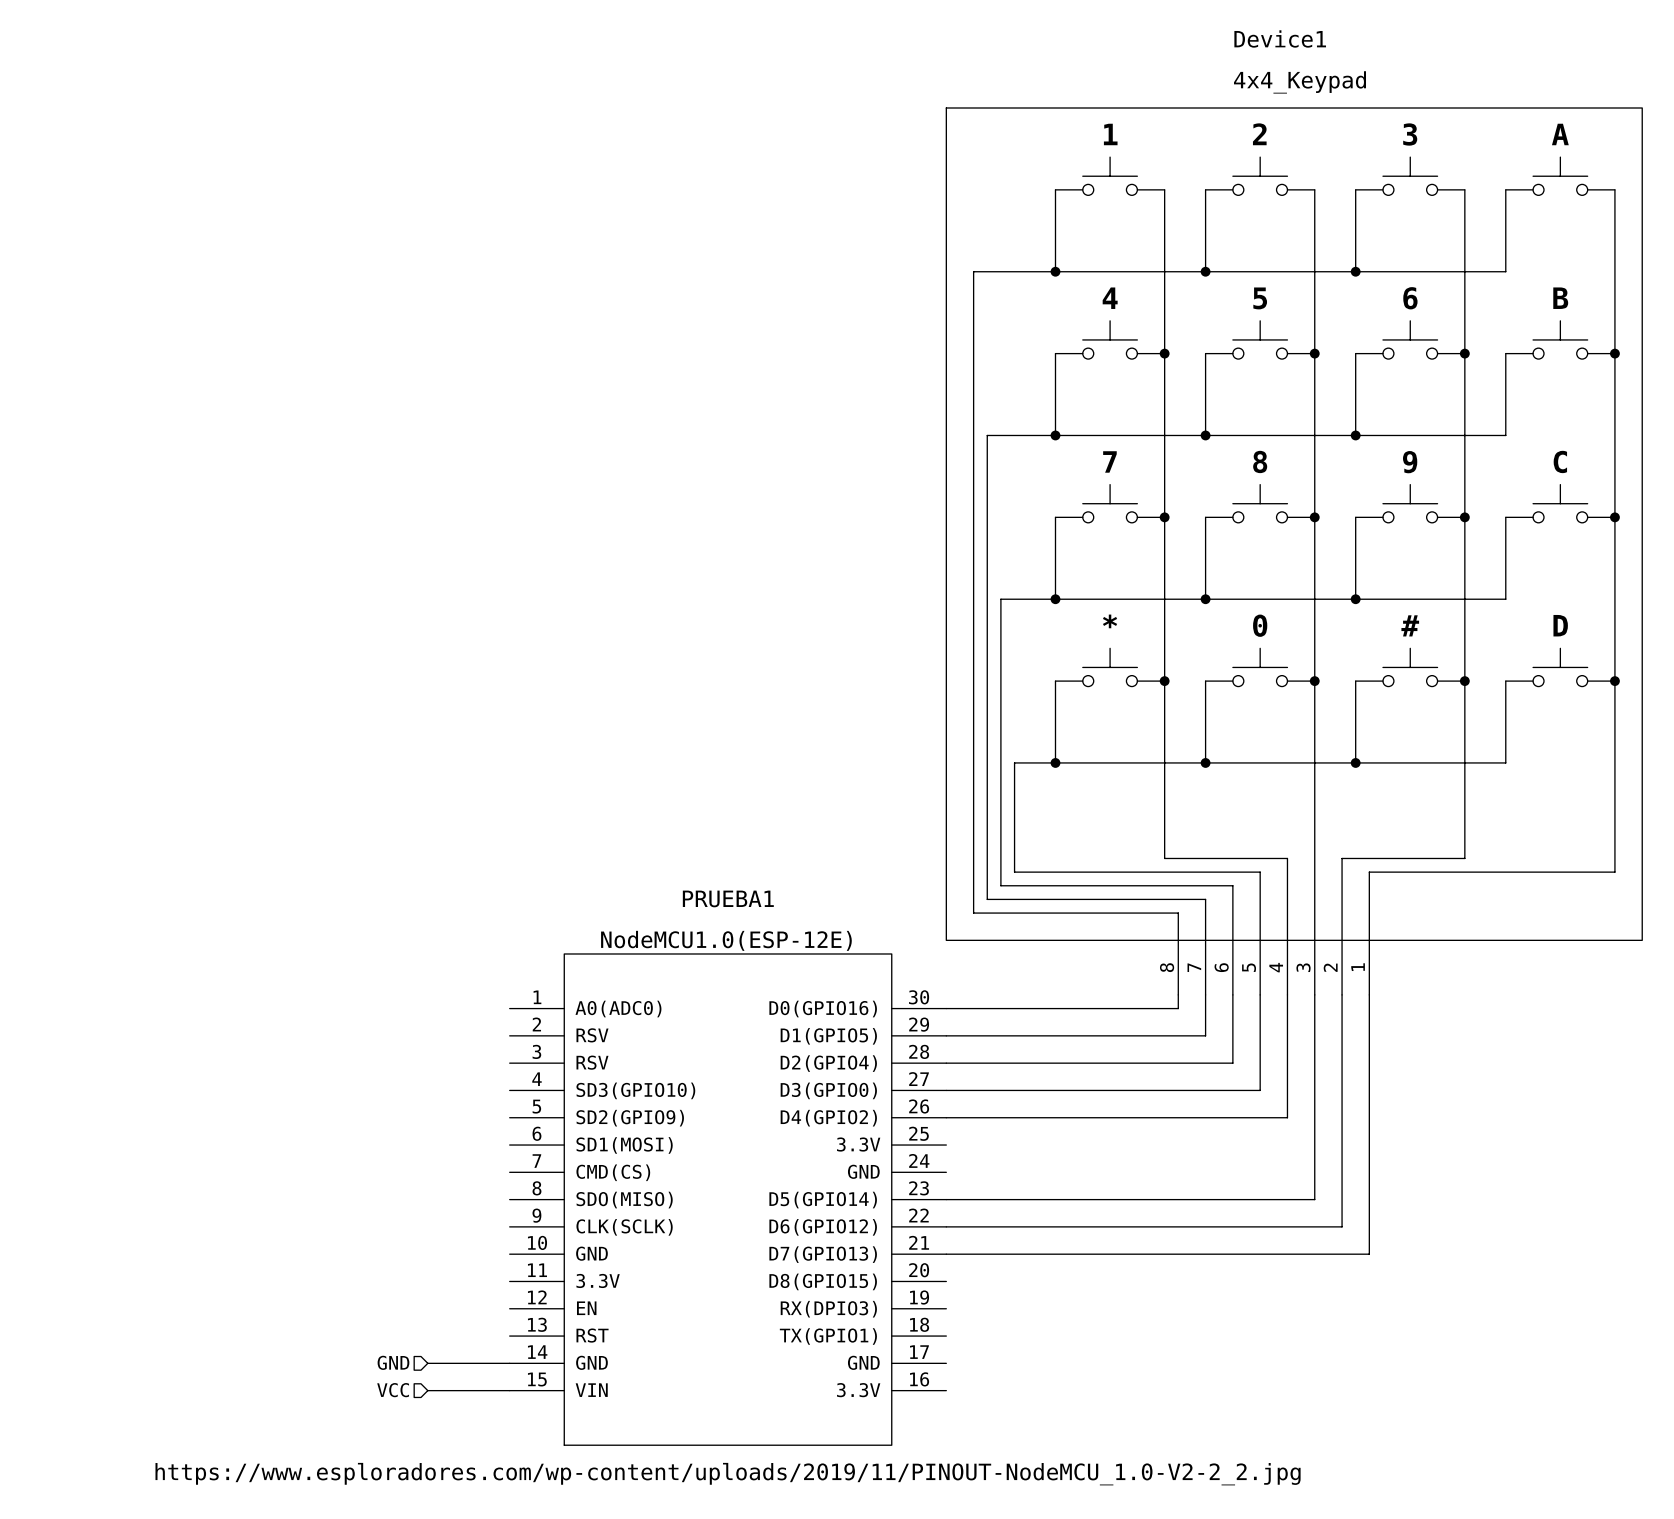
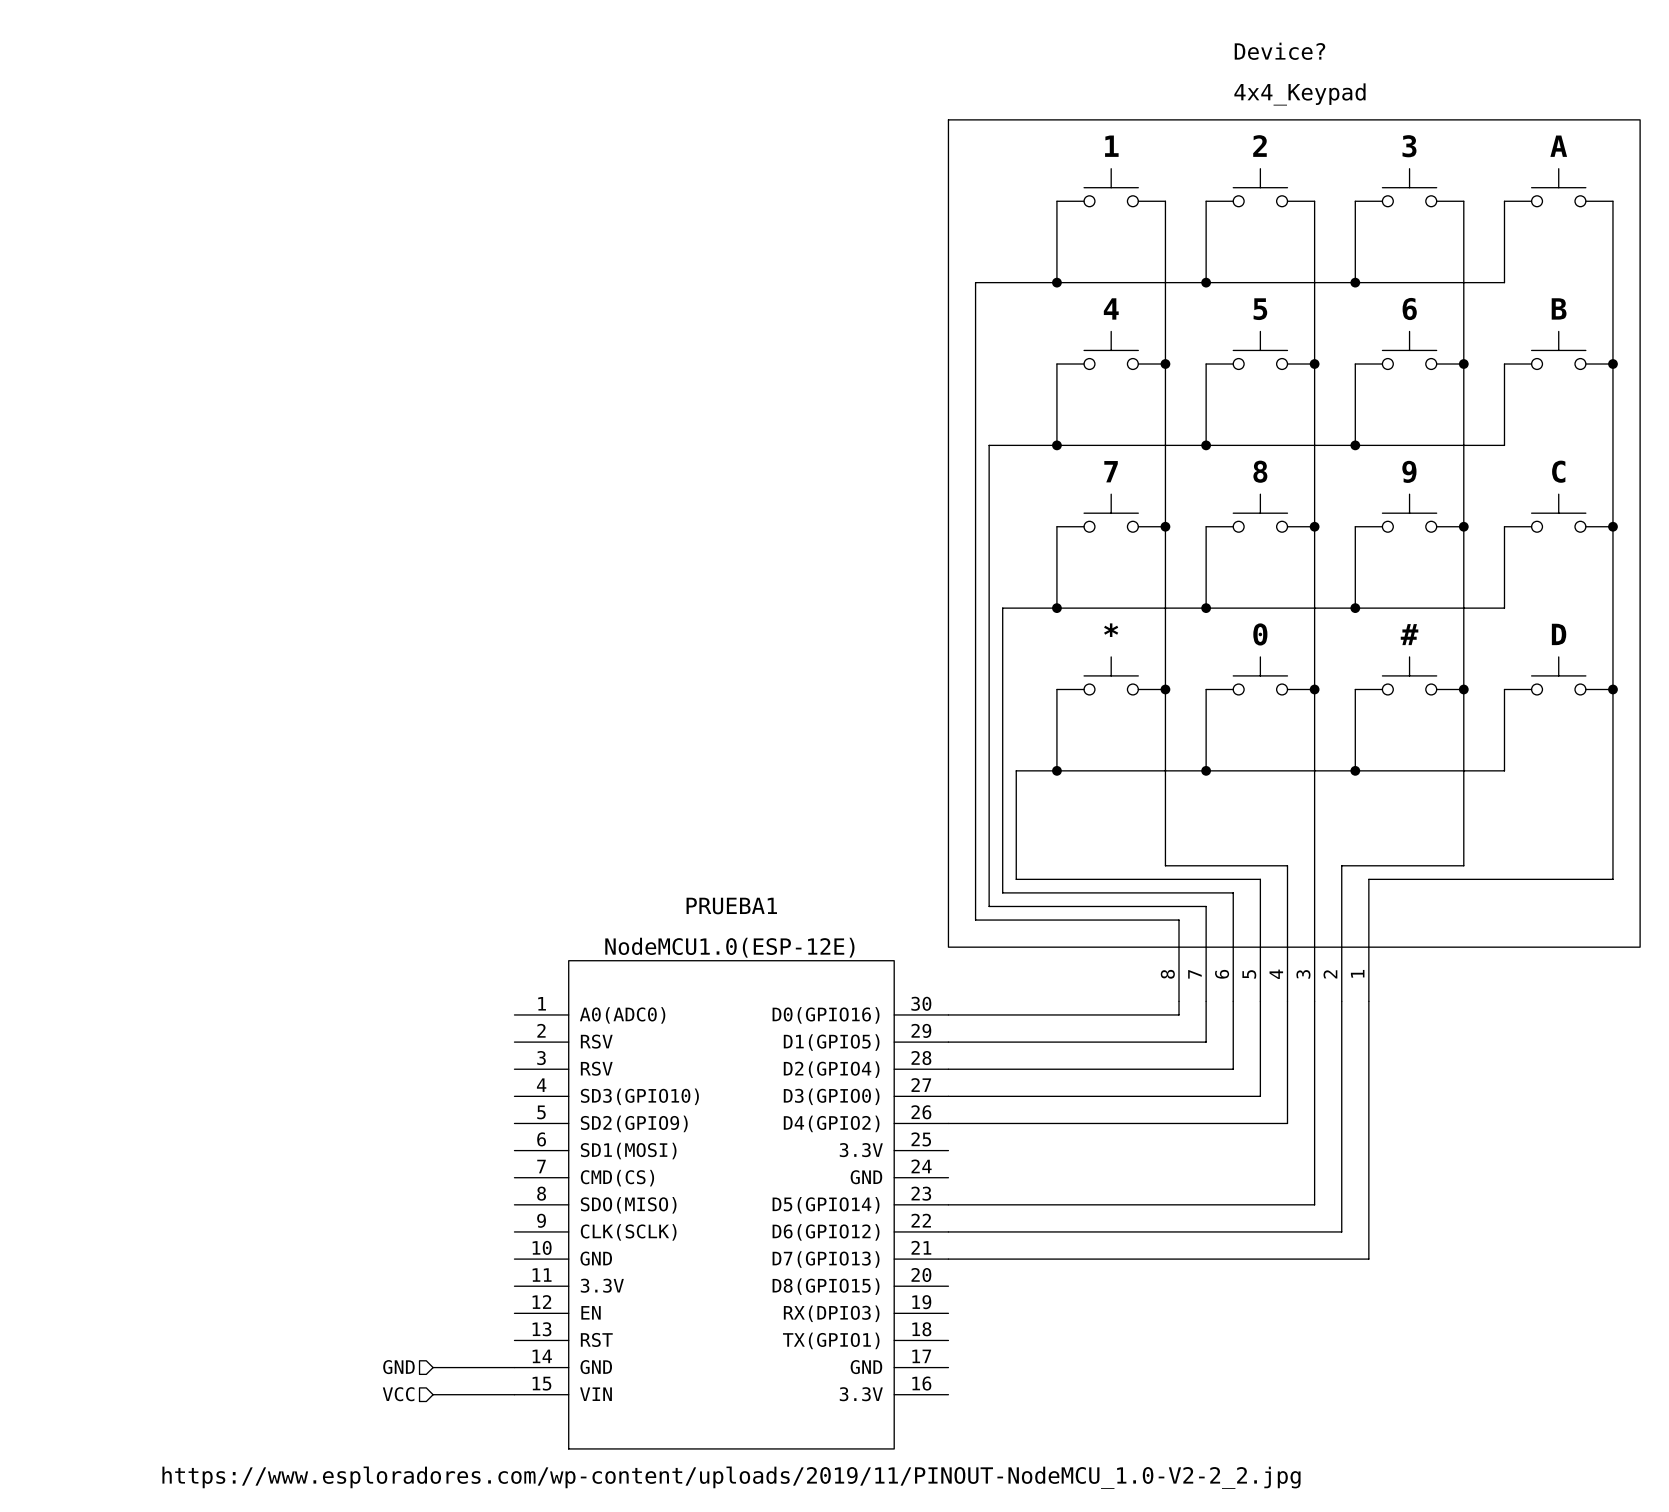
Device1 name: Device1 (1280, 38) -> Device? (1279, 51)

